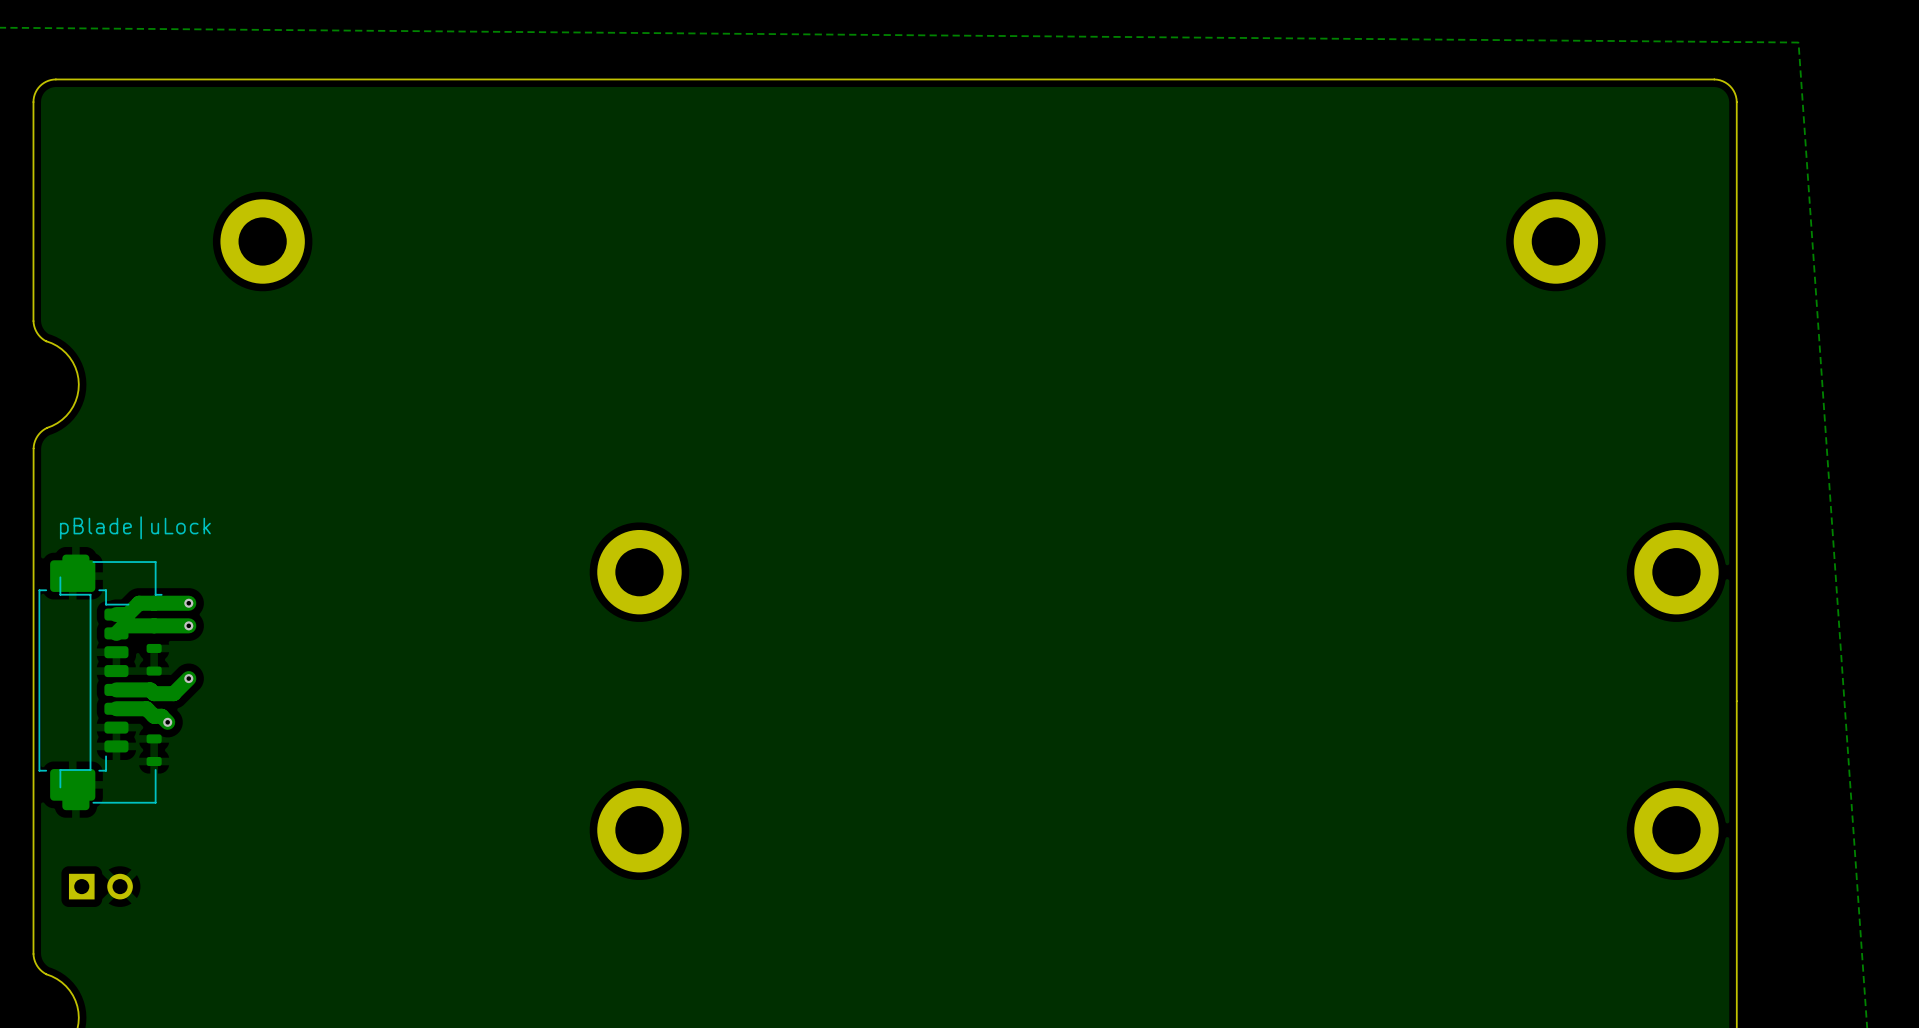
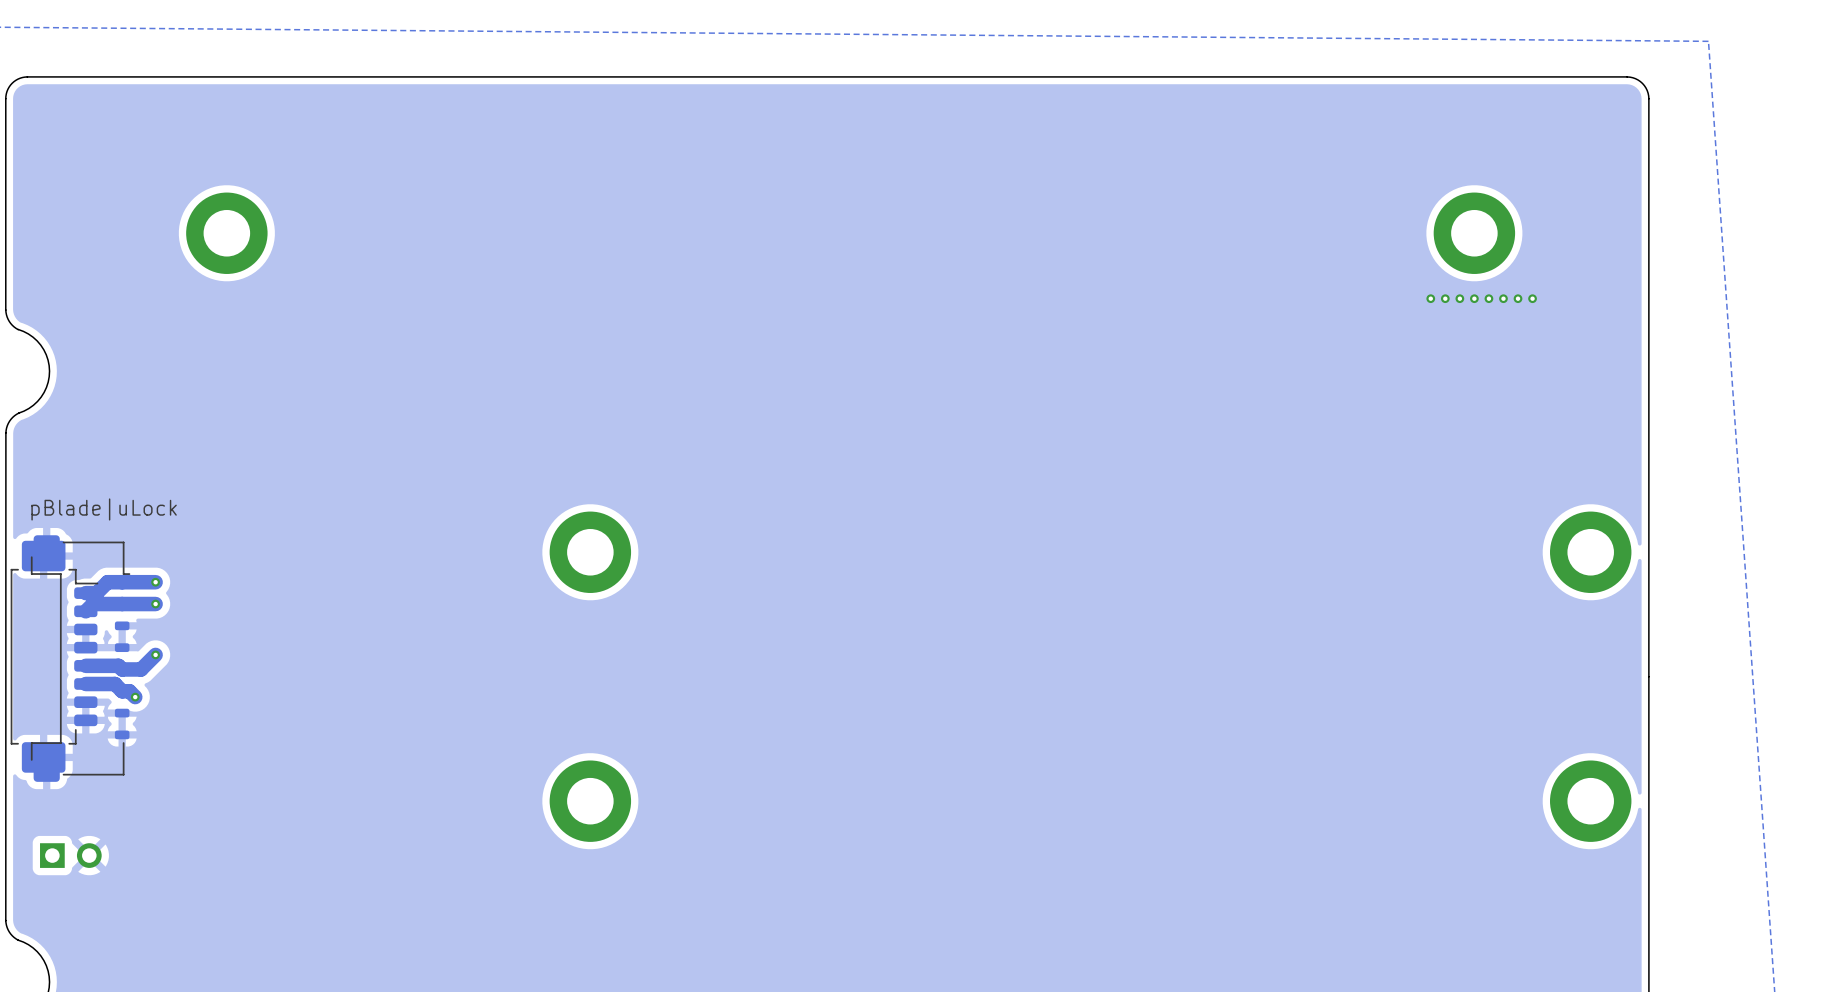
via: none -> (1430, 298)
via: none -> (1445, 298)
via: none -> (1459, 298)
via: none -> (1474, 298)
via: none -> (1488, 298)
via: none -> (1503, 298)
via: none -> (1518, 298)
via: none -> (1532, 298)

